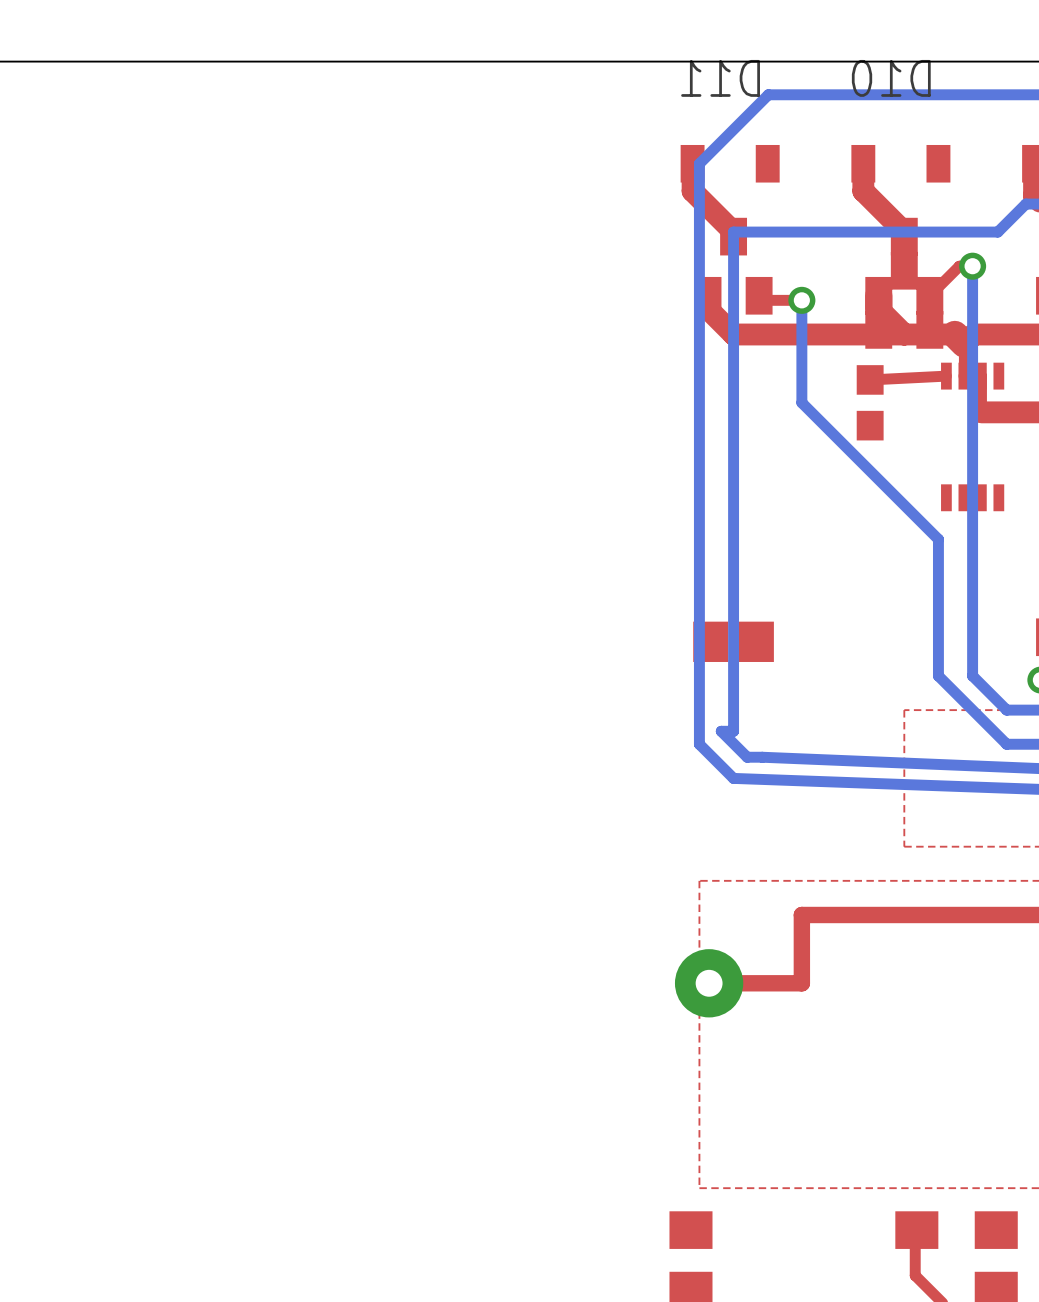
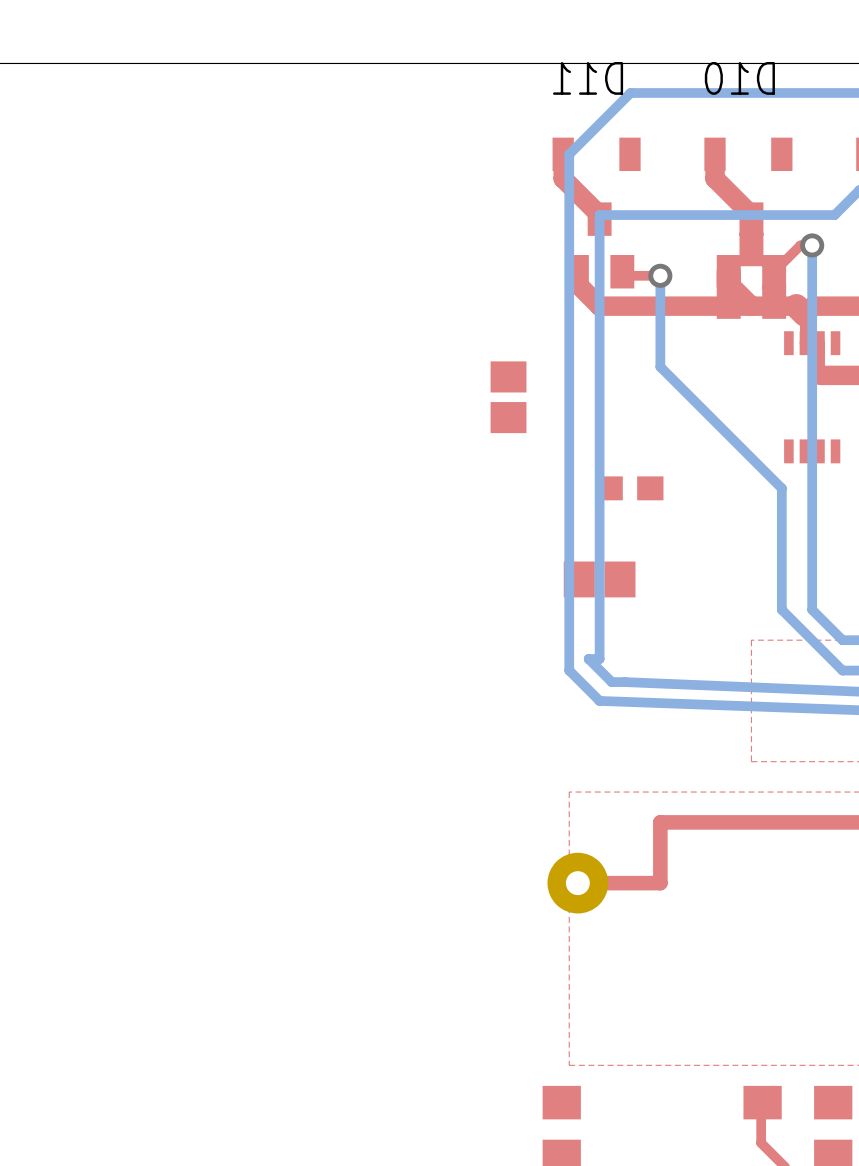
top track: (946, 376) (870, 379) -> none
part rotation: 0° (870, 402) -> 90° clockwise (629, 488)
part position: (870, 402) -> (629, 488)
part: none -> (508, 397)

